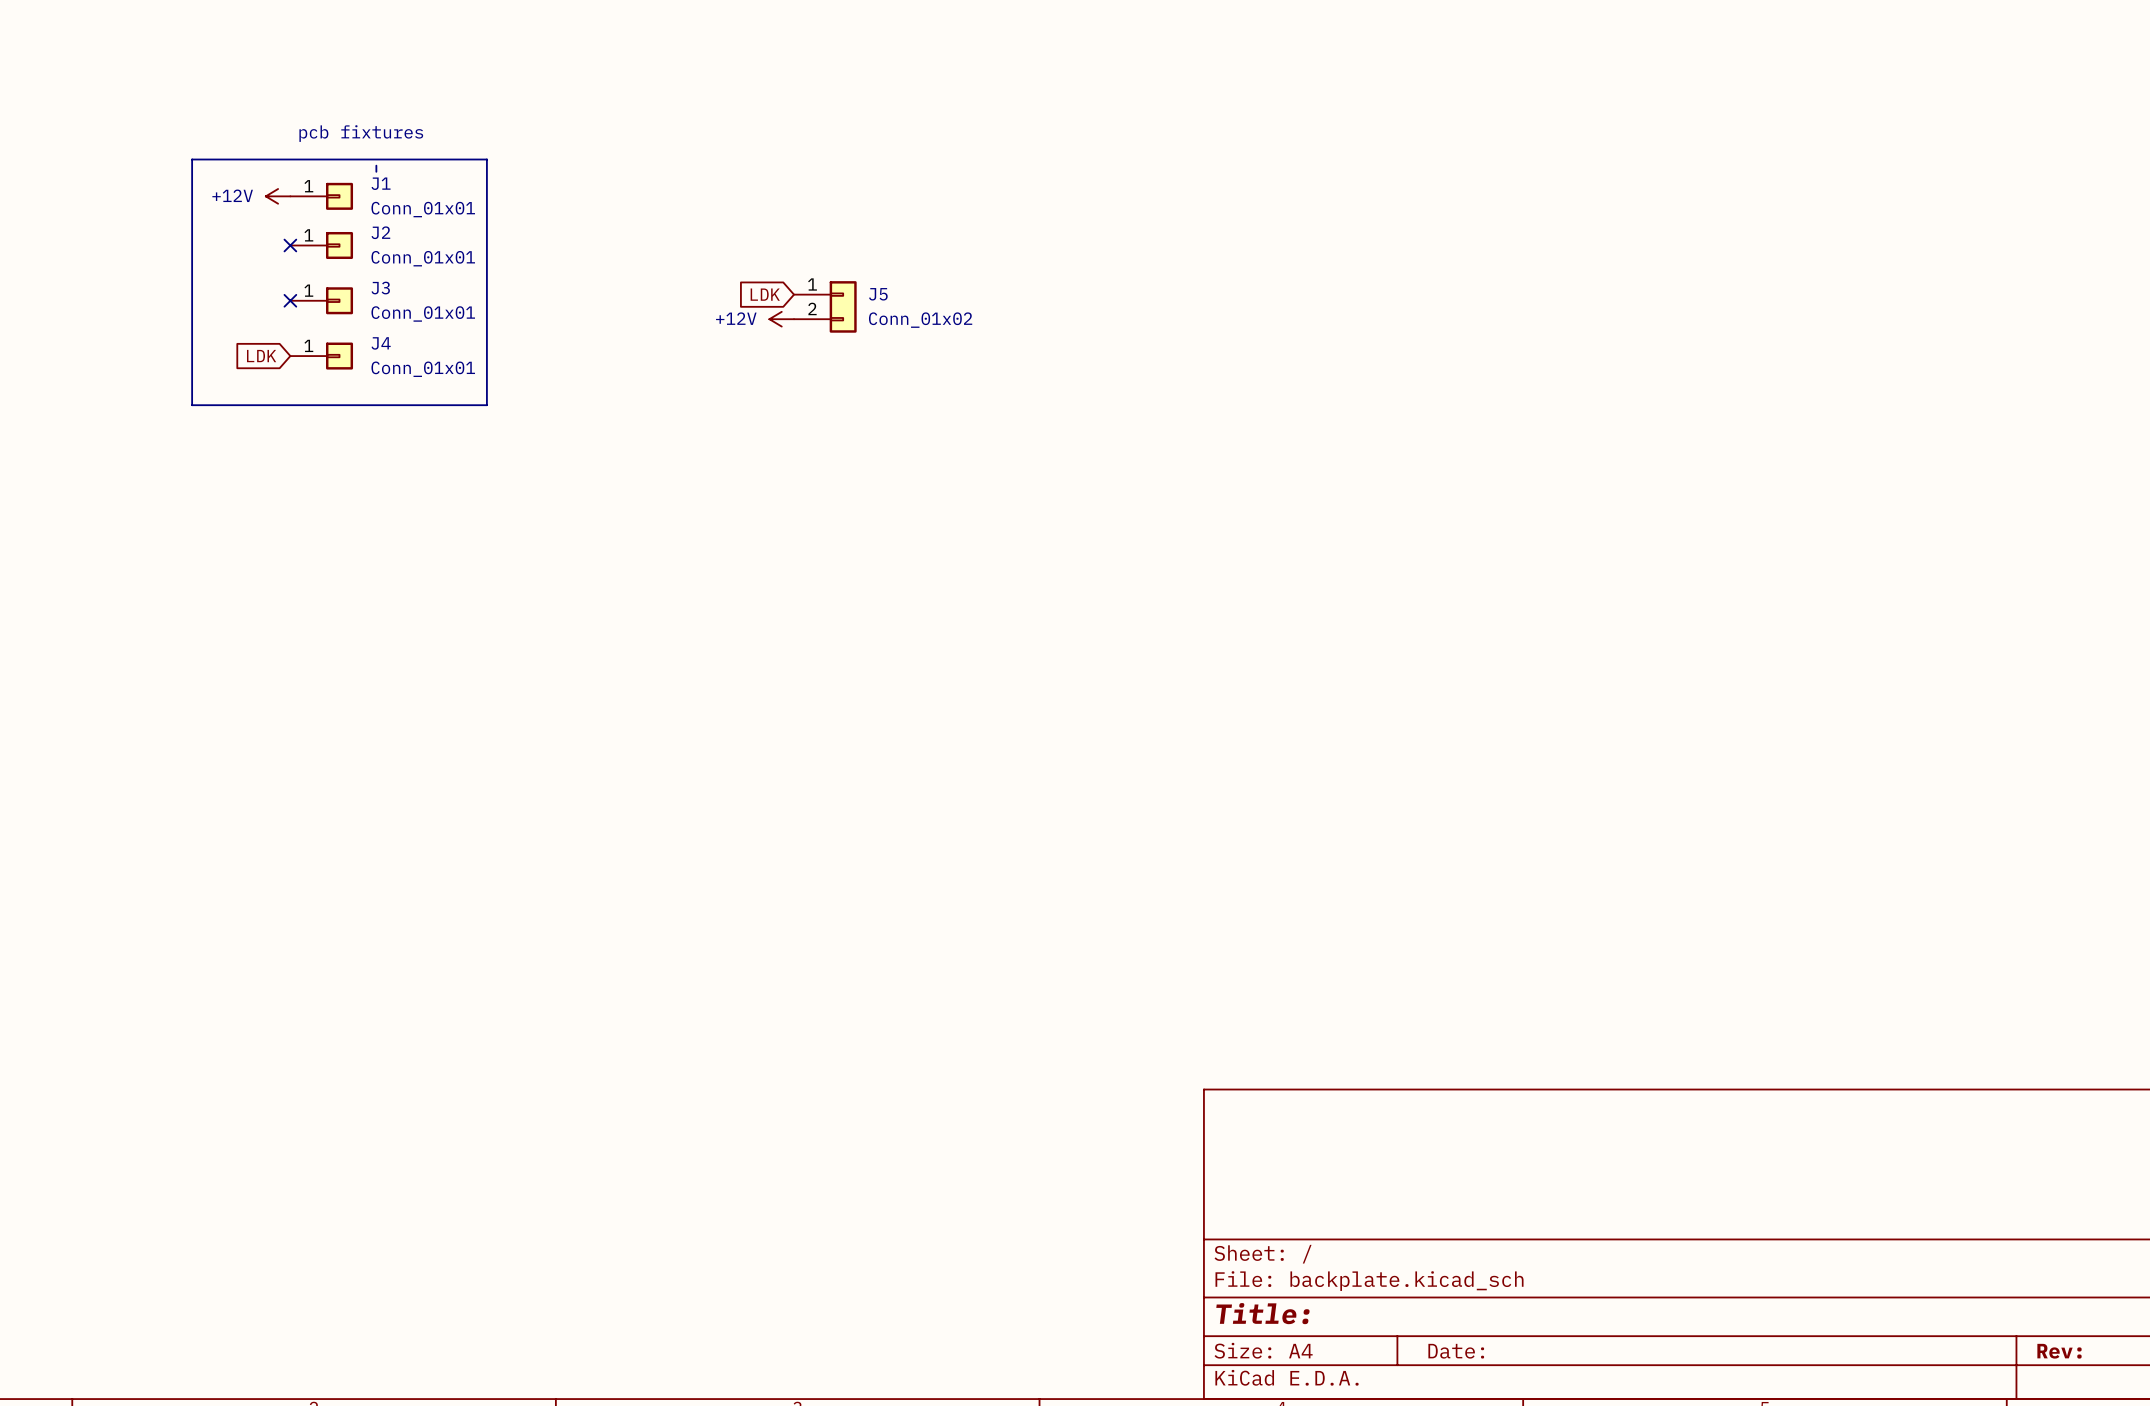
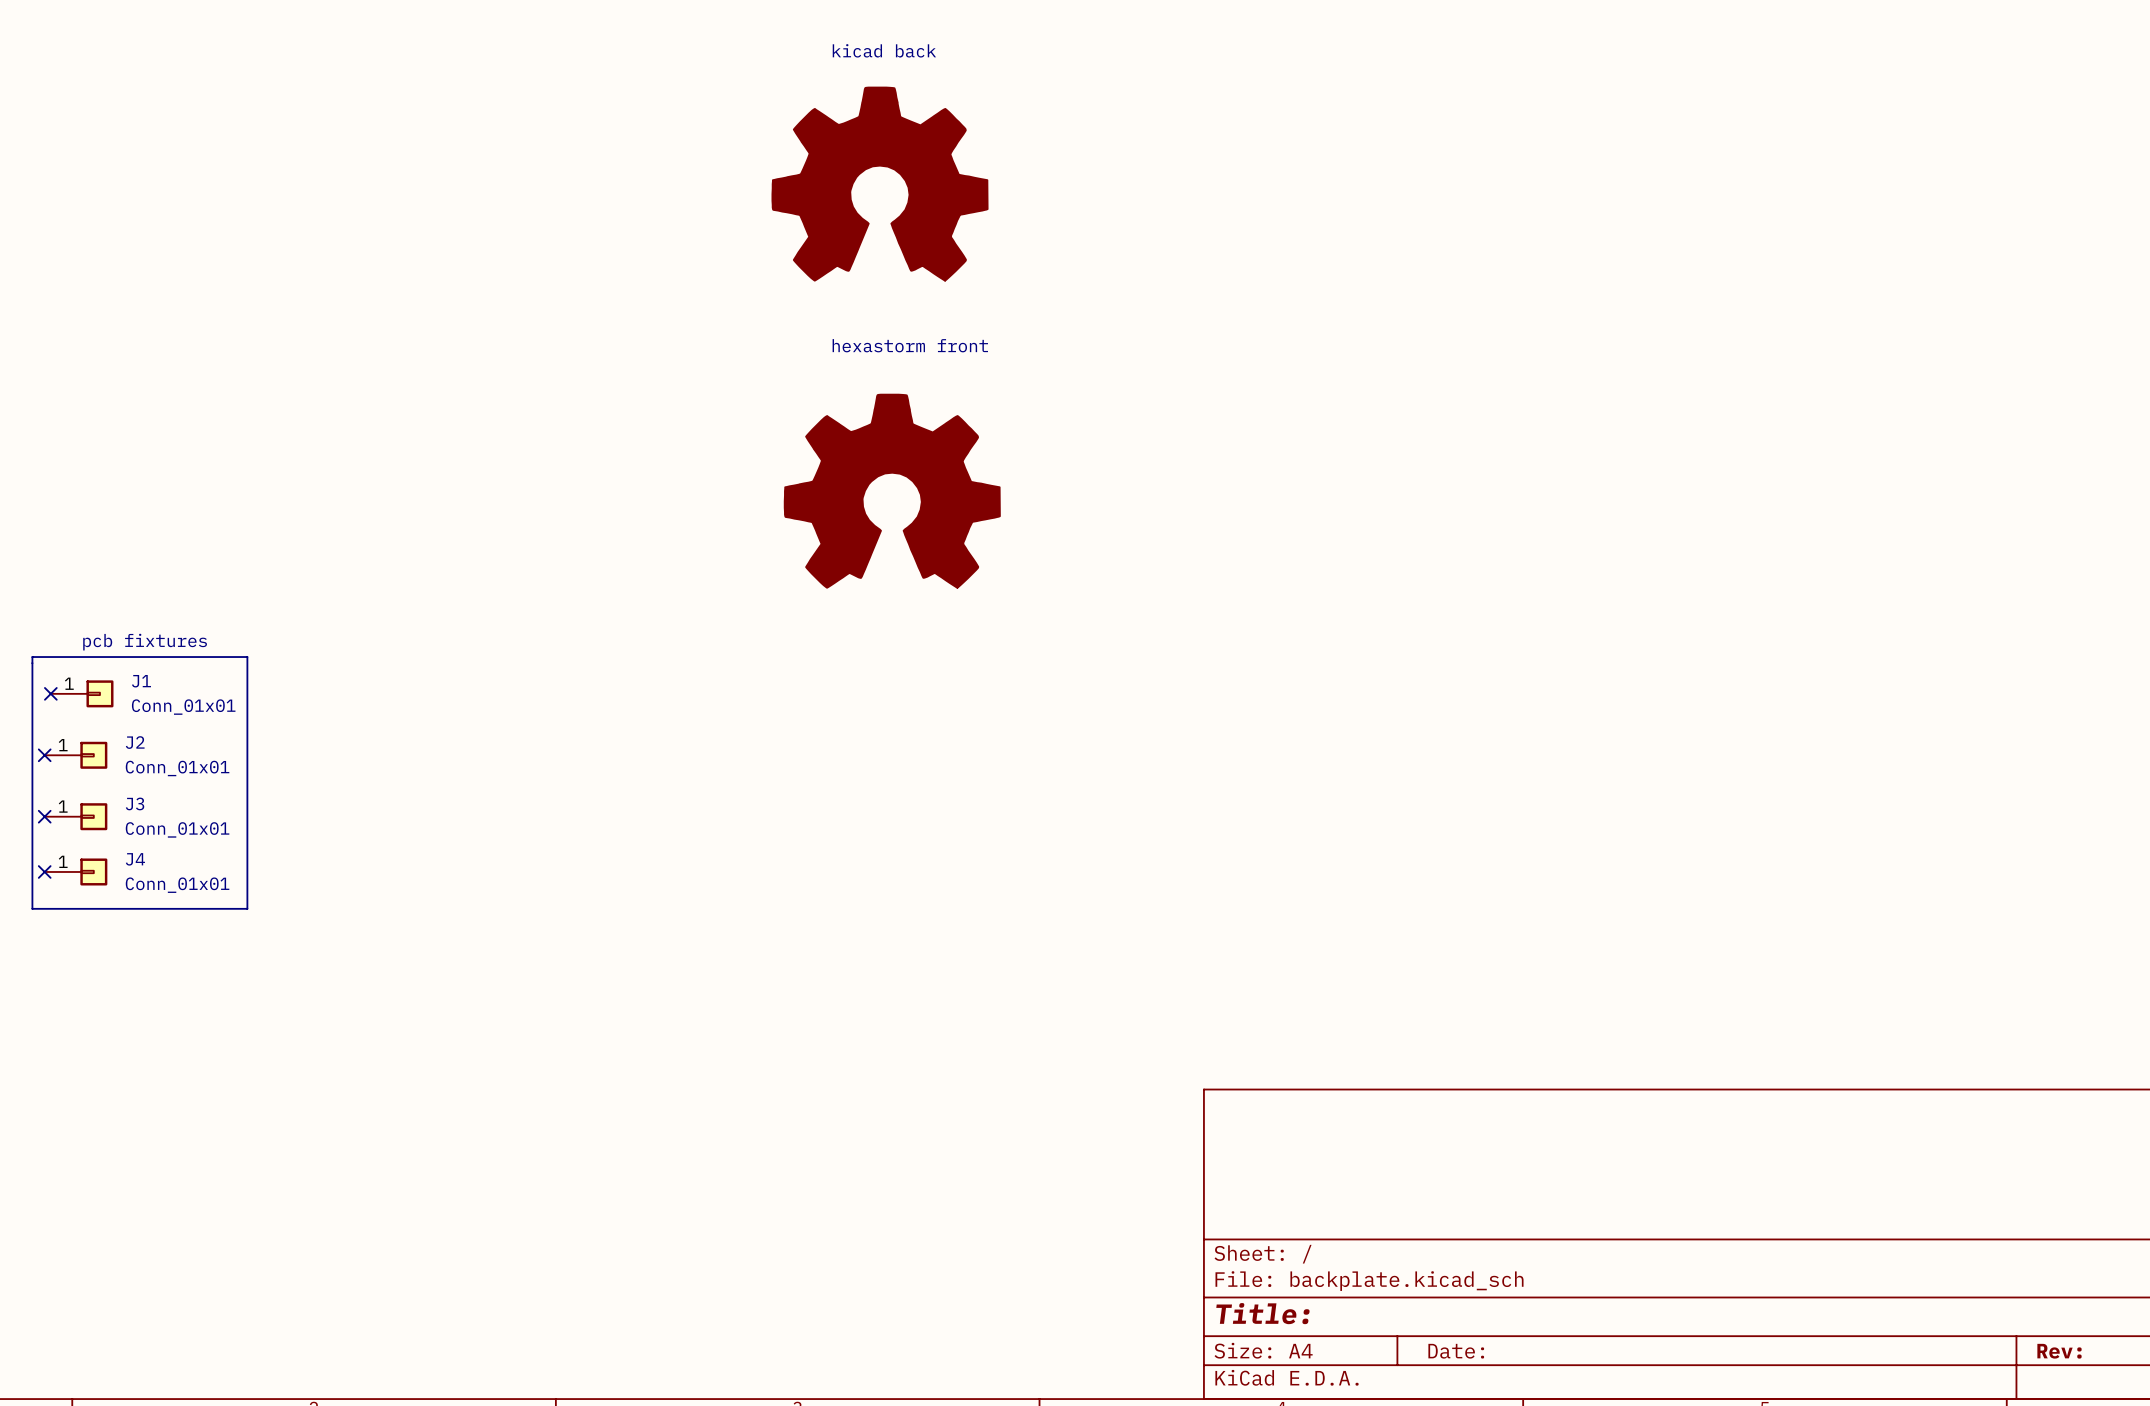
text: none -> kicad back (884, 50)
text: pcb fixtures (361, 133) -> none
line: (192, 159) (486, 159) (486, 405) (192, 405) (192, 159) -> none
line: (376, 165) (376, 171) -> none
part: none -> (880, 184)
power symbol: +12V (278, 196) -> none
J1 position: (321, 196) -> (82, 693)
no-connect mark: (290, 245) -> none
J2 position: (321, 245) -> (76, 755)
global label: LDK (765, 294) -> none
no-connect mark: (290, 300) -> none
J3 position: (321, 300) -> (76, 816)
J5: Conn_01x02 (825, 306) -> none
power symbol: +12V (781, 319) -> none
text: none -> hexastorm front (910, 345)
global label: LDK (261, 356) -> none
J4 position: (321, 356) -> (76, 871)
part: none -> (892, 491)
text: none -> pcb fixtures (145, 642)
line: none -> (32, 657) (247, 657) (247, 908) (32, 908) (32, 657)
no-connect mark: none -> (50, 693)
no-connect mark: none -> (44, 755)
no-connect mark: none -> (44, 816)
no-connect mark: none -> (44, 871)

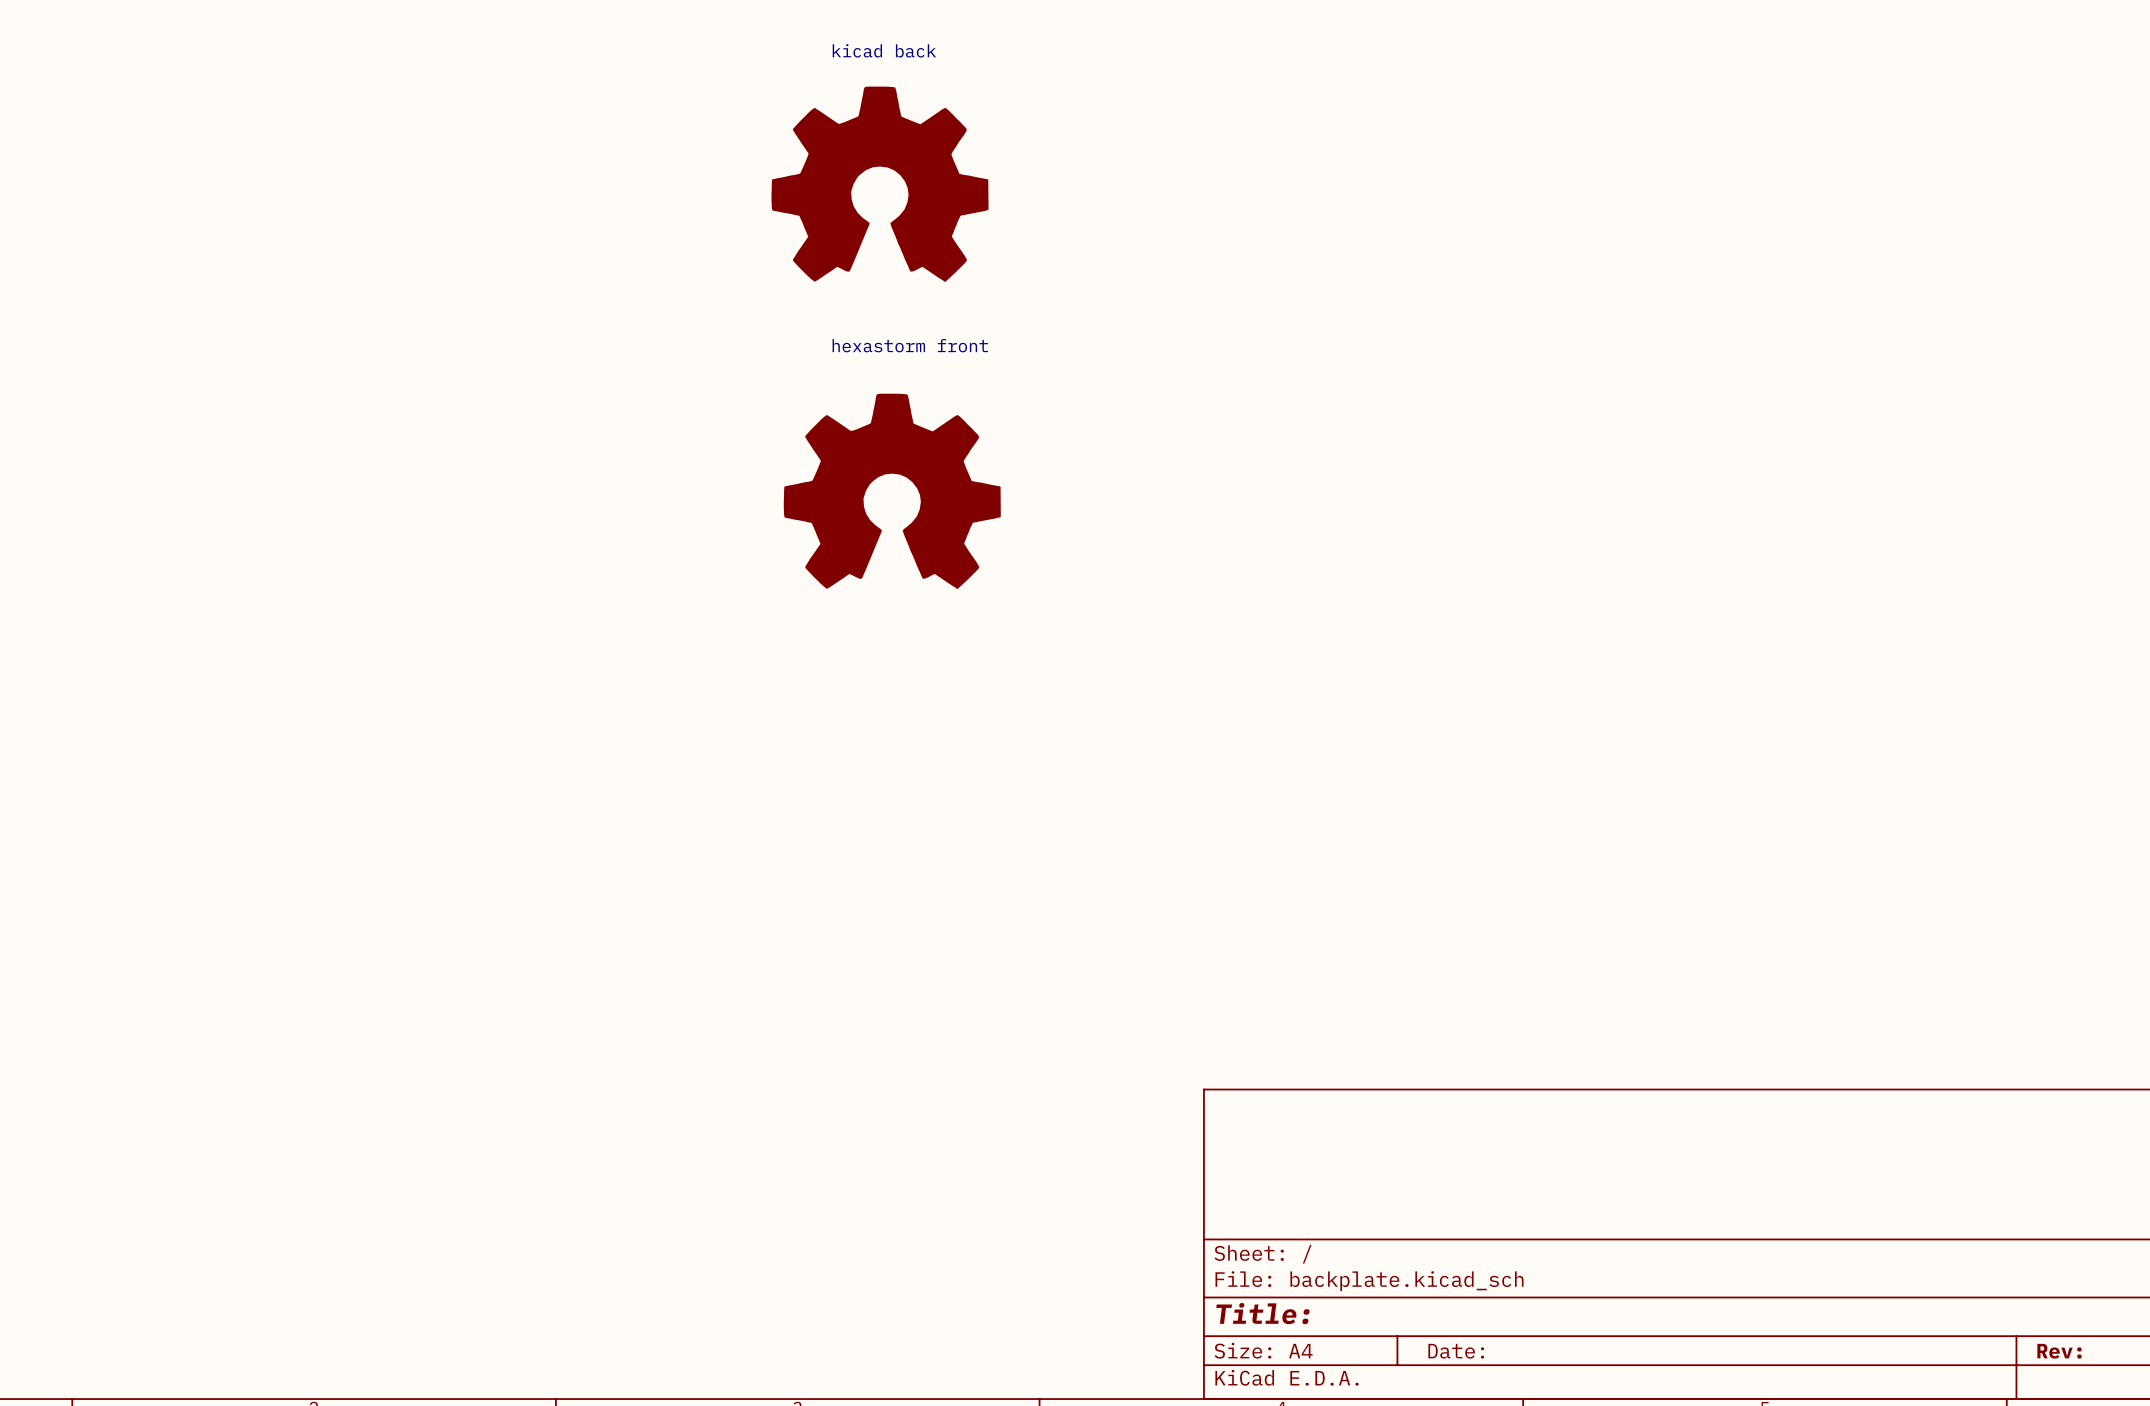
text: pcb fixtures (145, 642) -> none
line: (32, 657) (247, 657) (247, 908) (32, 908) (32, 657) -> none
no-connect mark: (50, 693) -> none
J1: Conn_01x01 (82, 693) -> none
no-connect mark: (44, 755) -> none
J2: Conn_01x01 (76, 755) -> none
no-connect mark: (44, 816) -> none
J3: Conn_01x01 (76, 816) -> none
no-connect mark: (44, 871) -> none
J4: Conn_01x01 (76, 871) -> none

